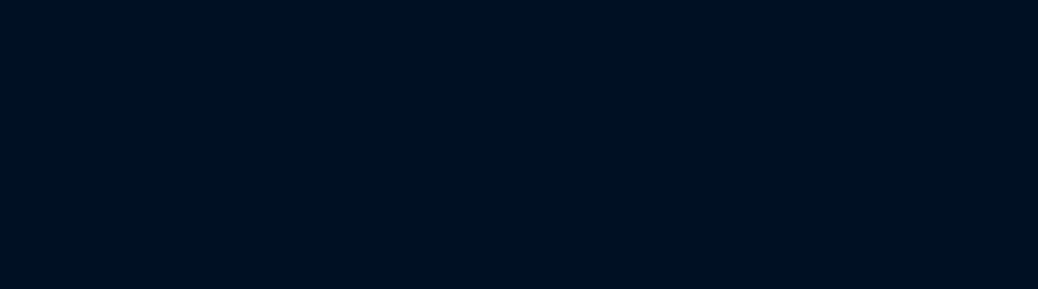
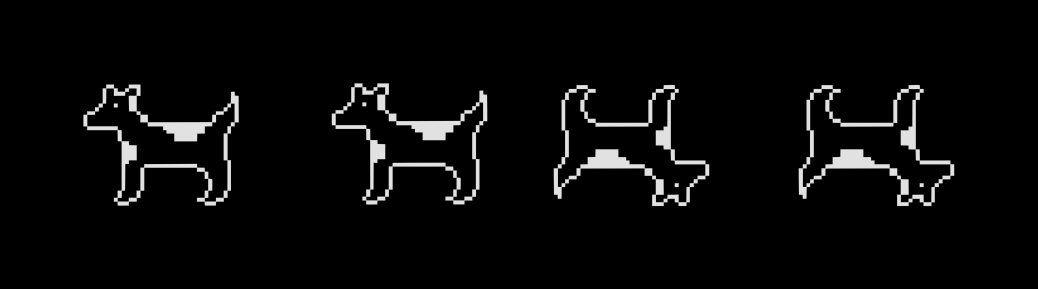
drawing: none -> [331, 83, 488, 205]
drawing: none -> [83, 84, 239, 206]
drawing: none -> [553, 84, 710, 207]
drawing: none -> [798, 84, 955, 207]

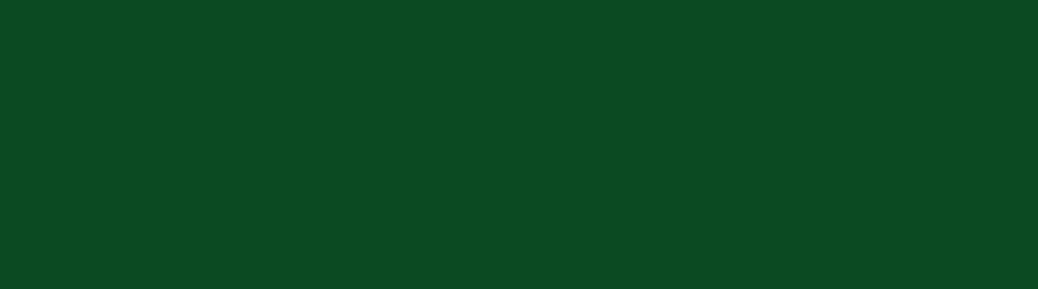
drawing: [331, 83, 488, 205] -> none
drawing: [83, 84, 239, 206] -> none
drawing: [553, 84, 710, 207] -> none
drawing: [798, 84, 955, 207] -> none

